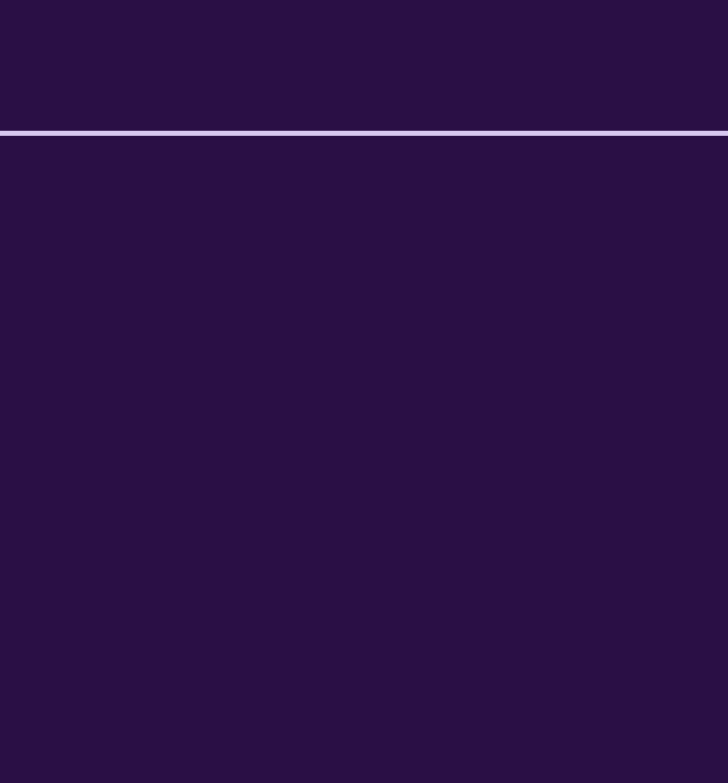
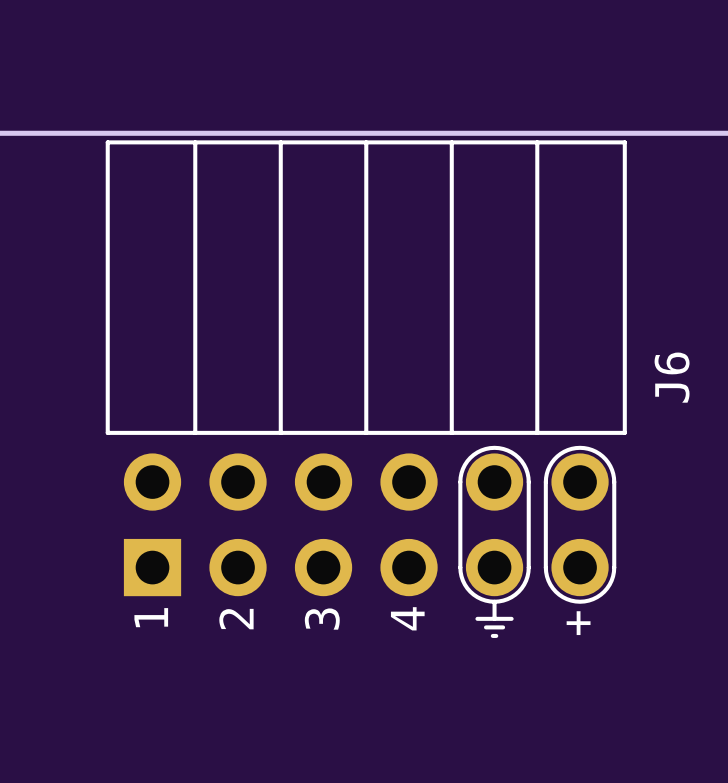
J6: none -> (366, 389)

